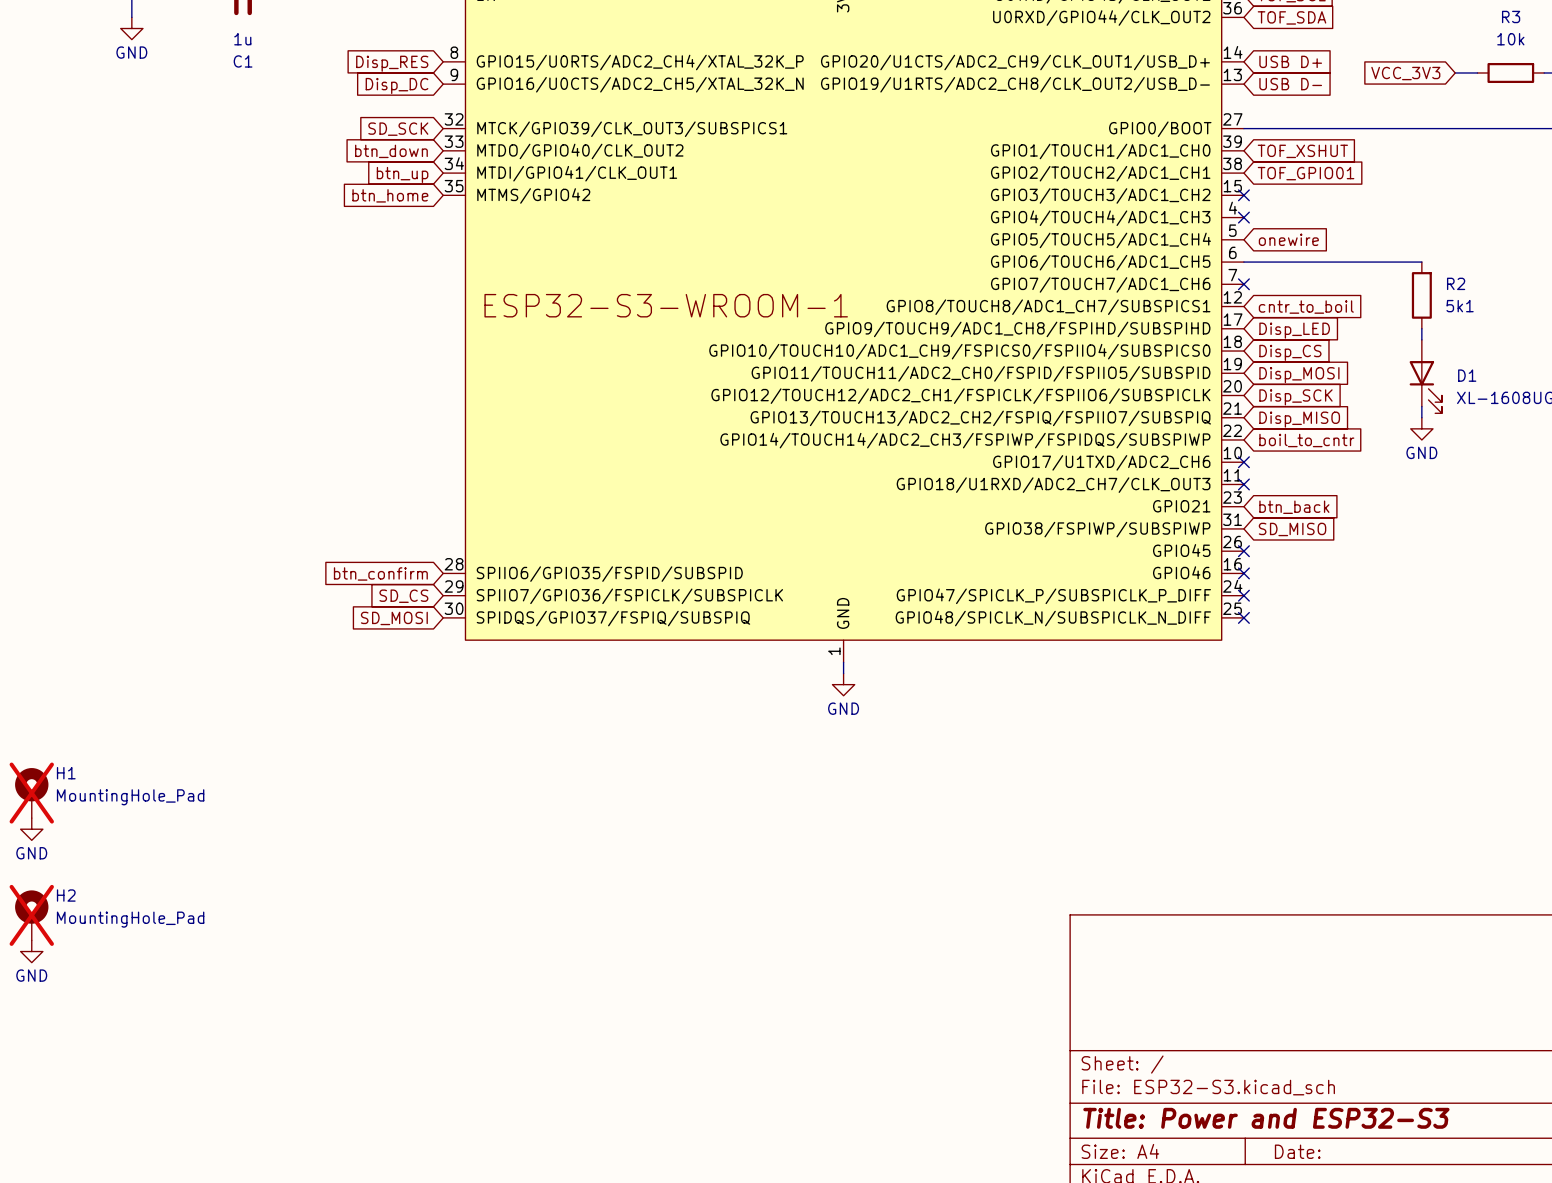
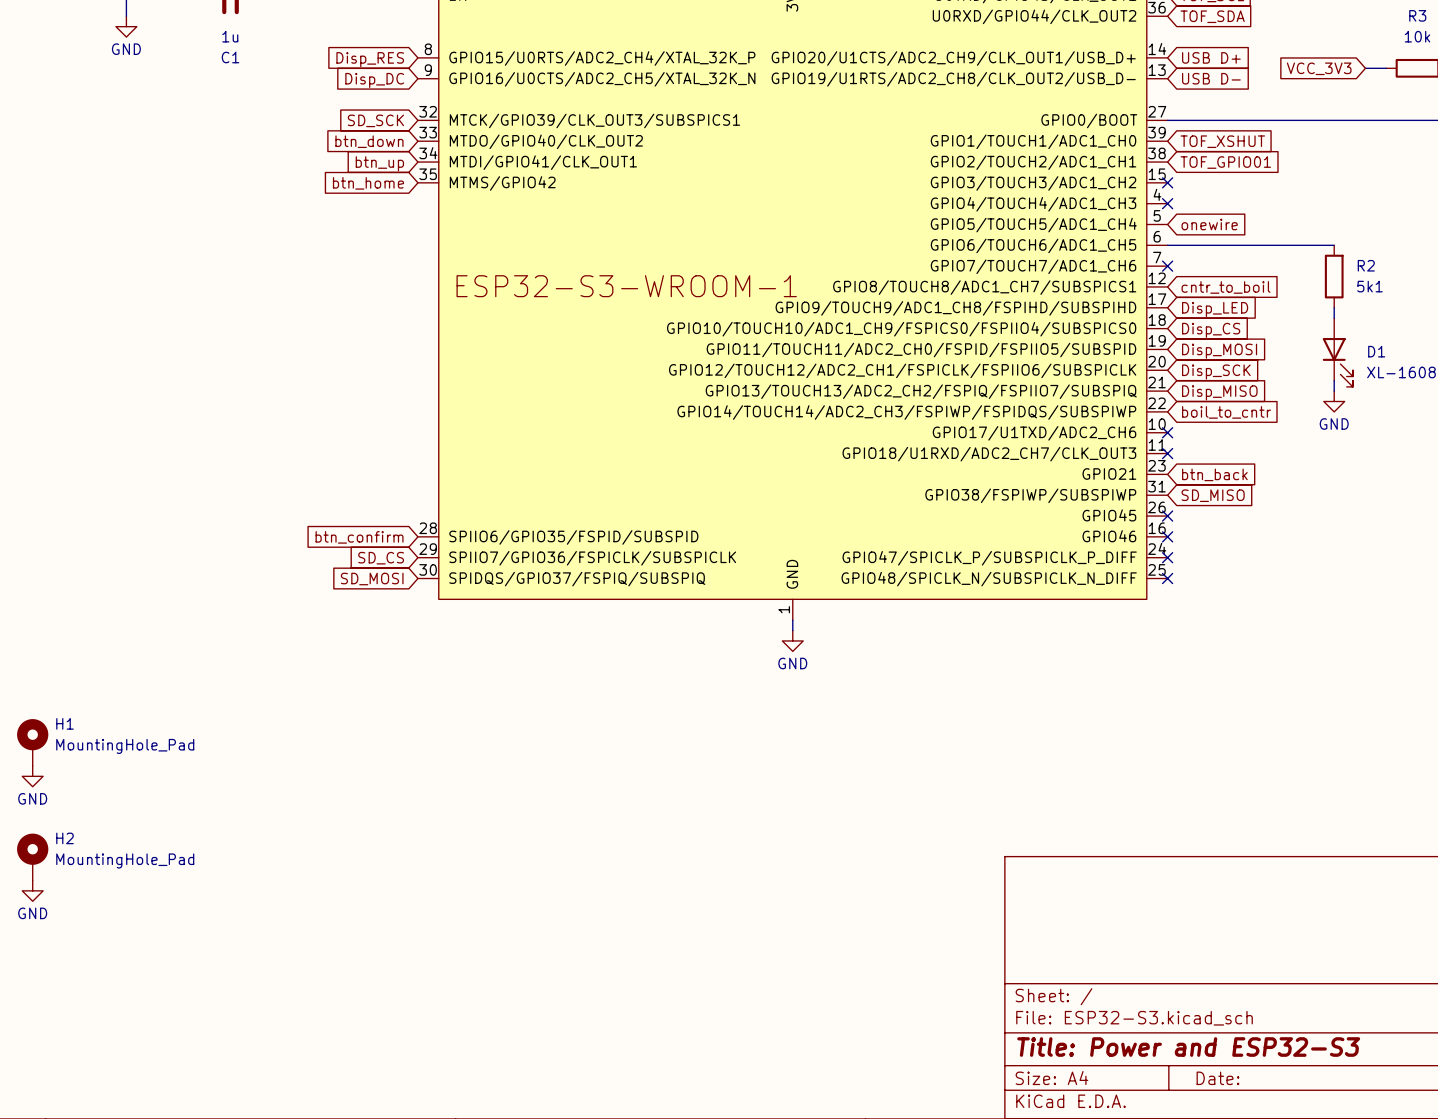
H1 do-not-place cross: (31, 793) -> none
H2 do-not-place cross: (31, 915) -> none

